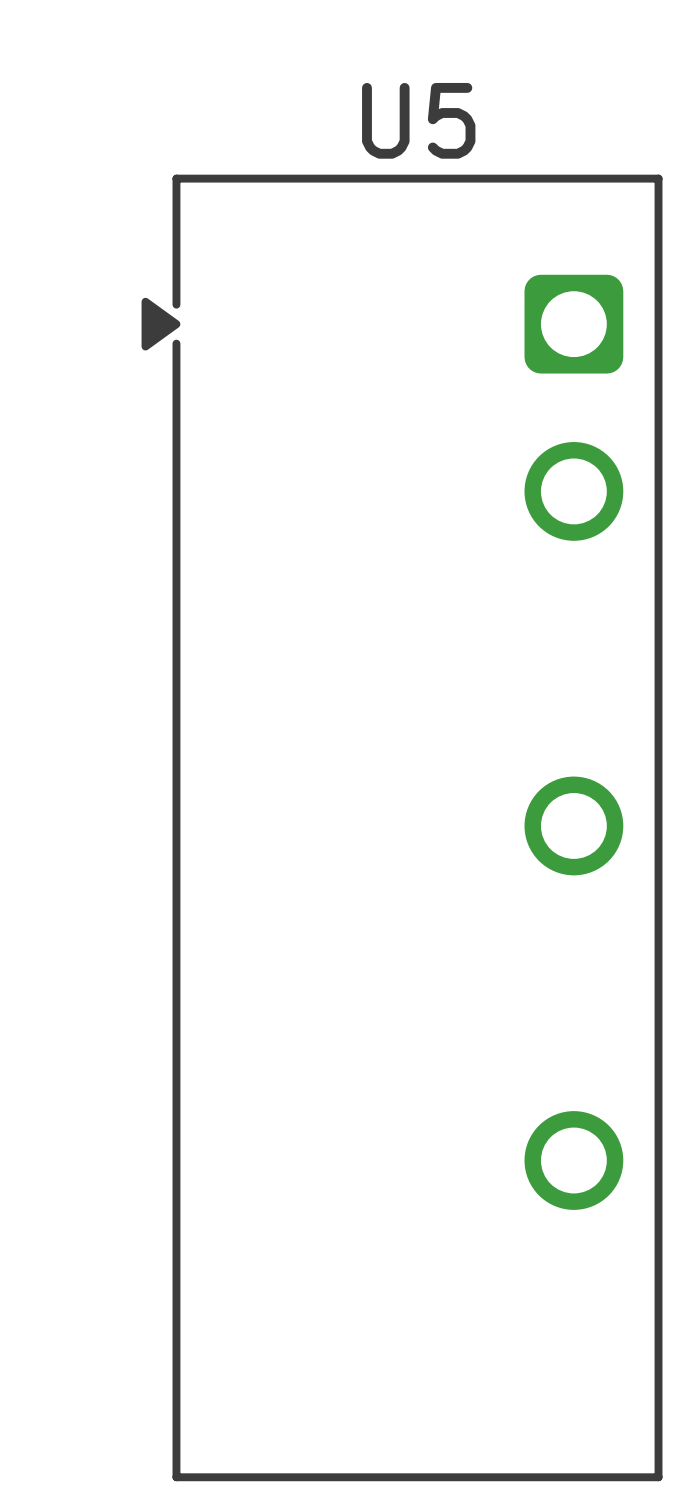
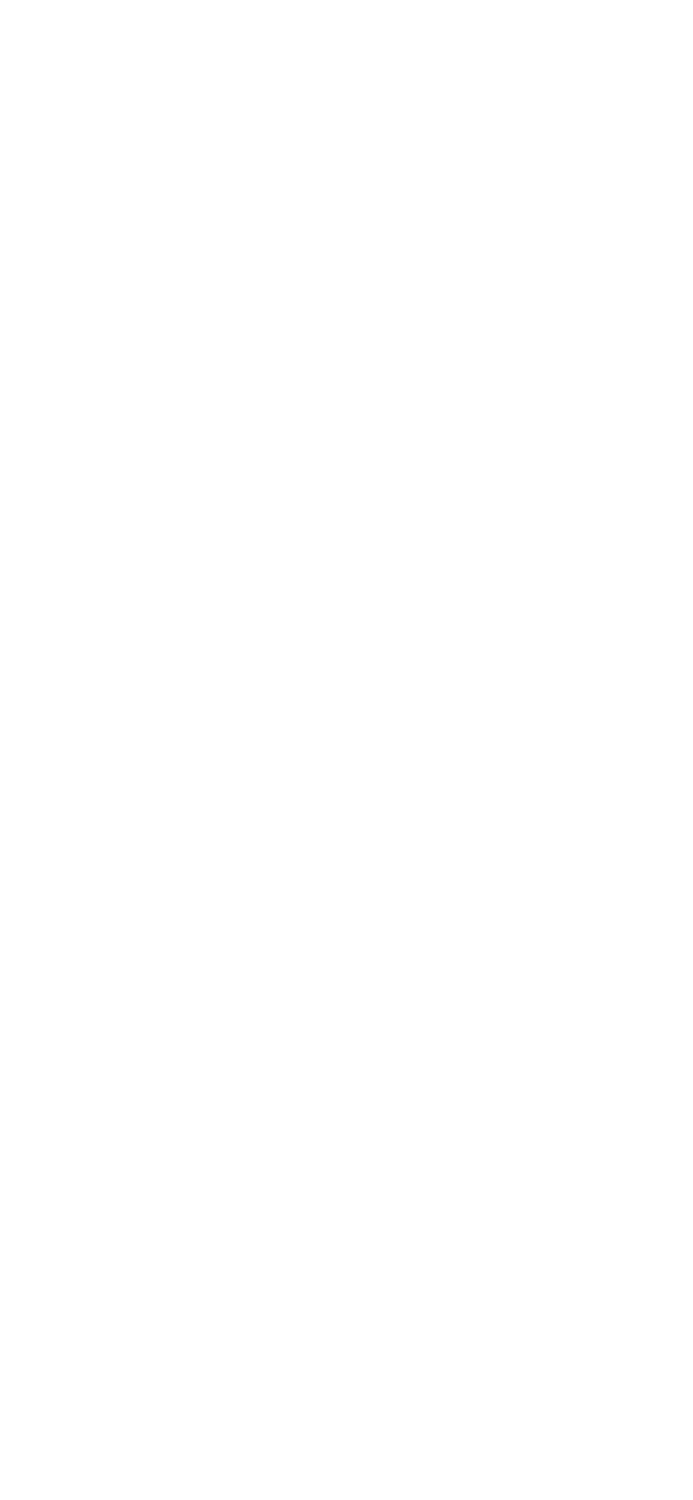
U5: (402, 827) -> none

